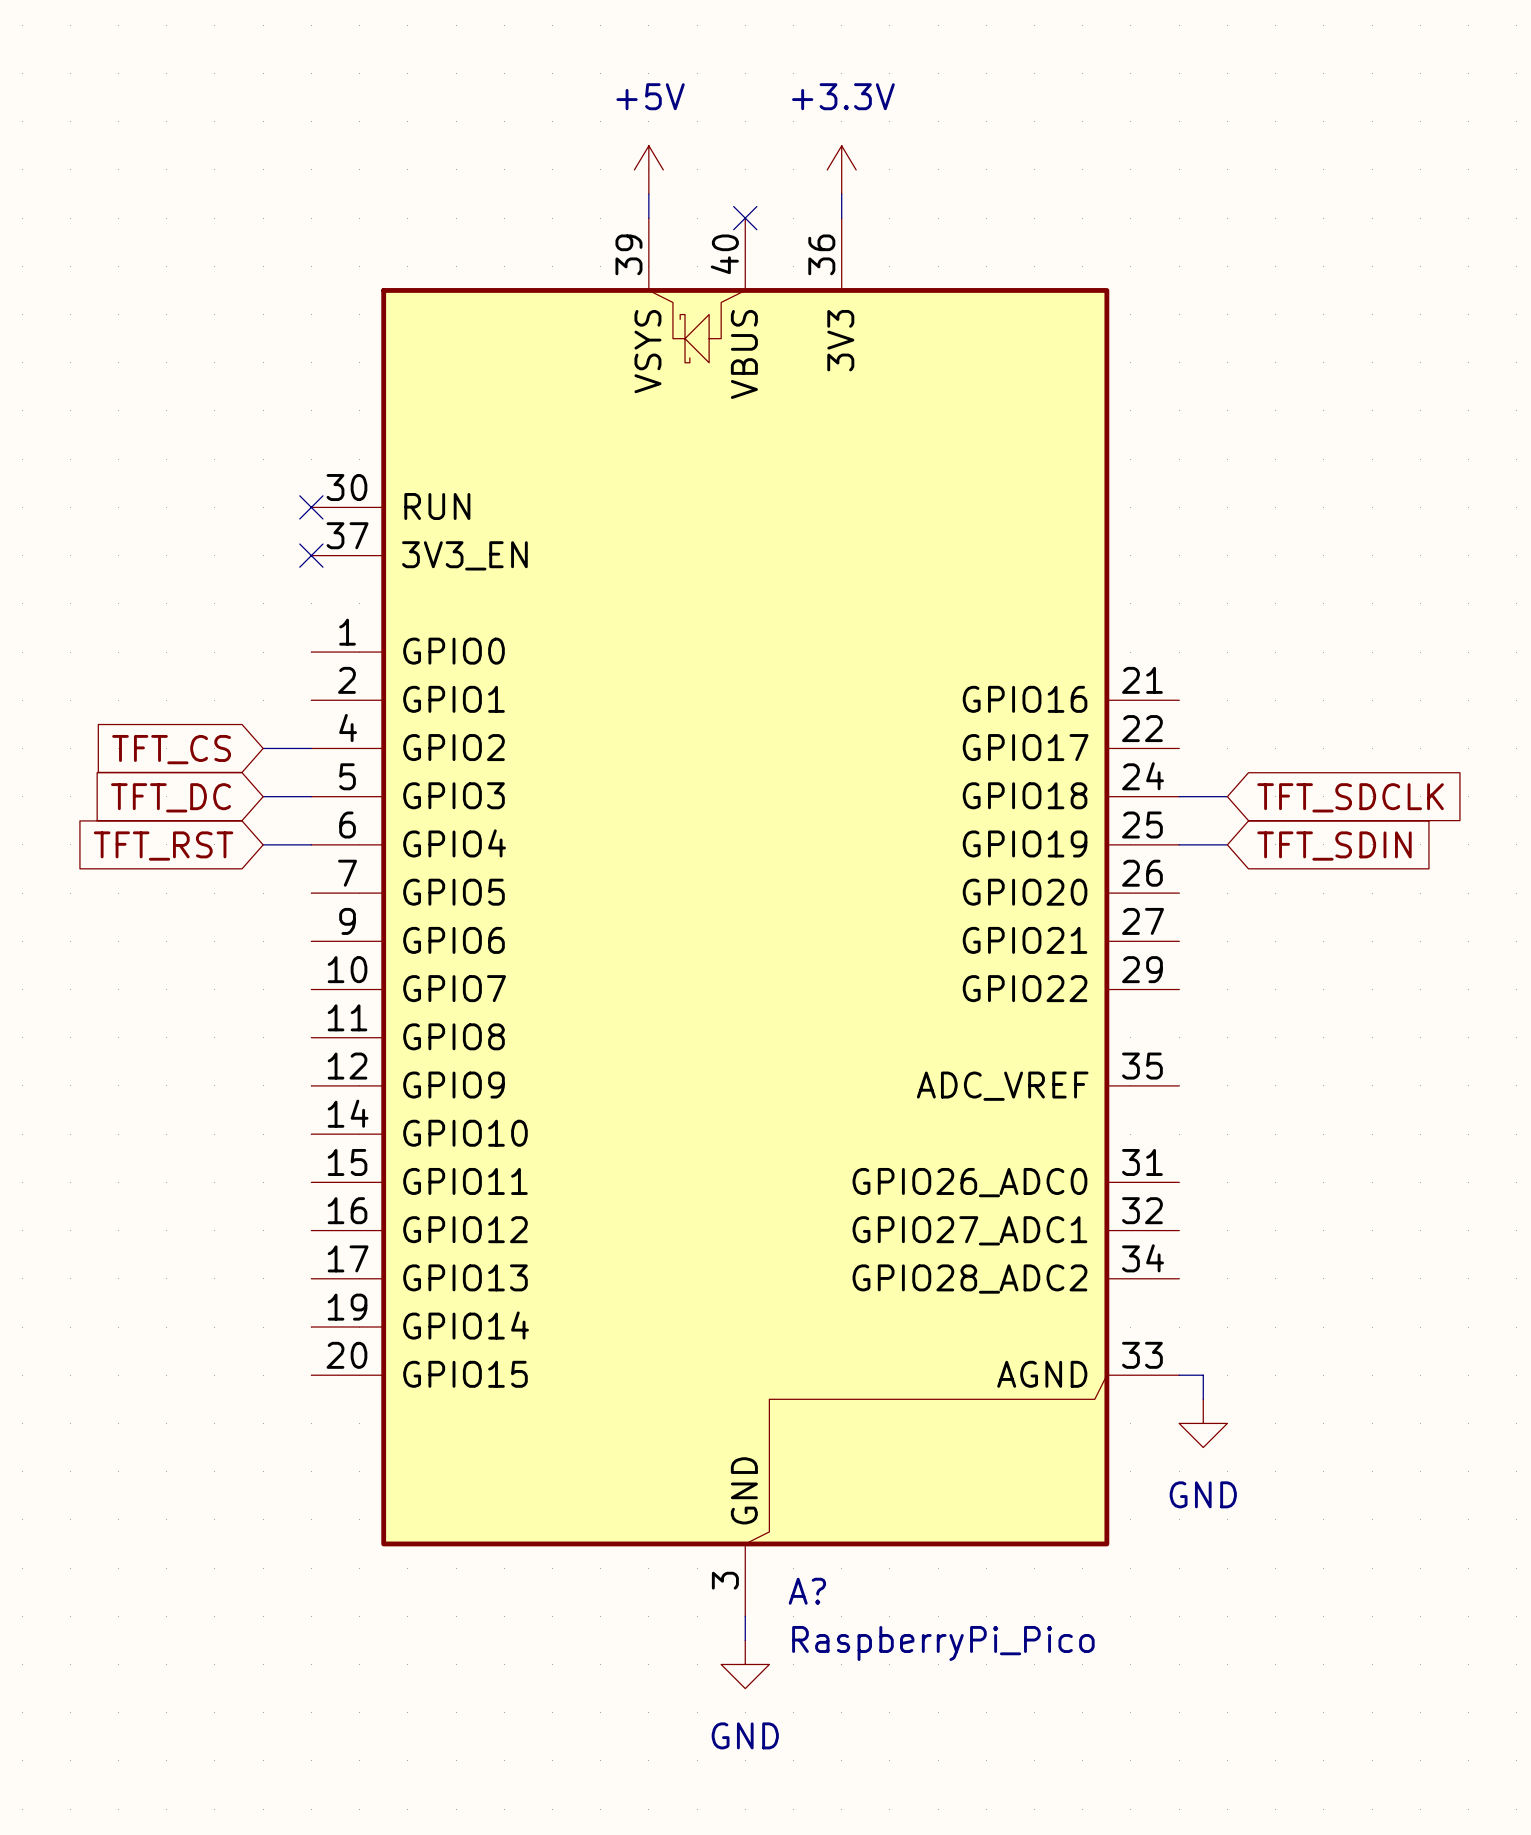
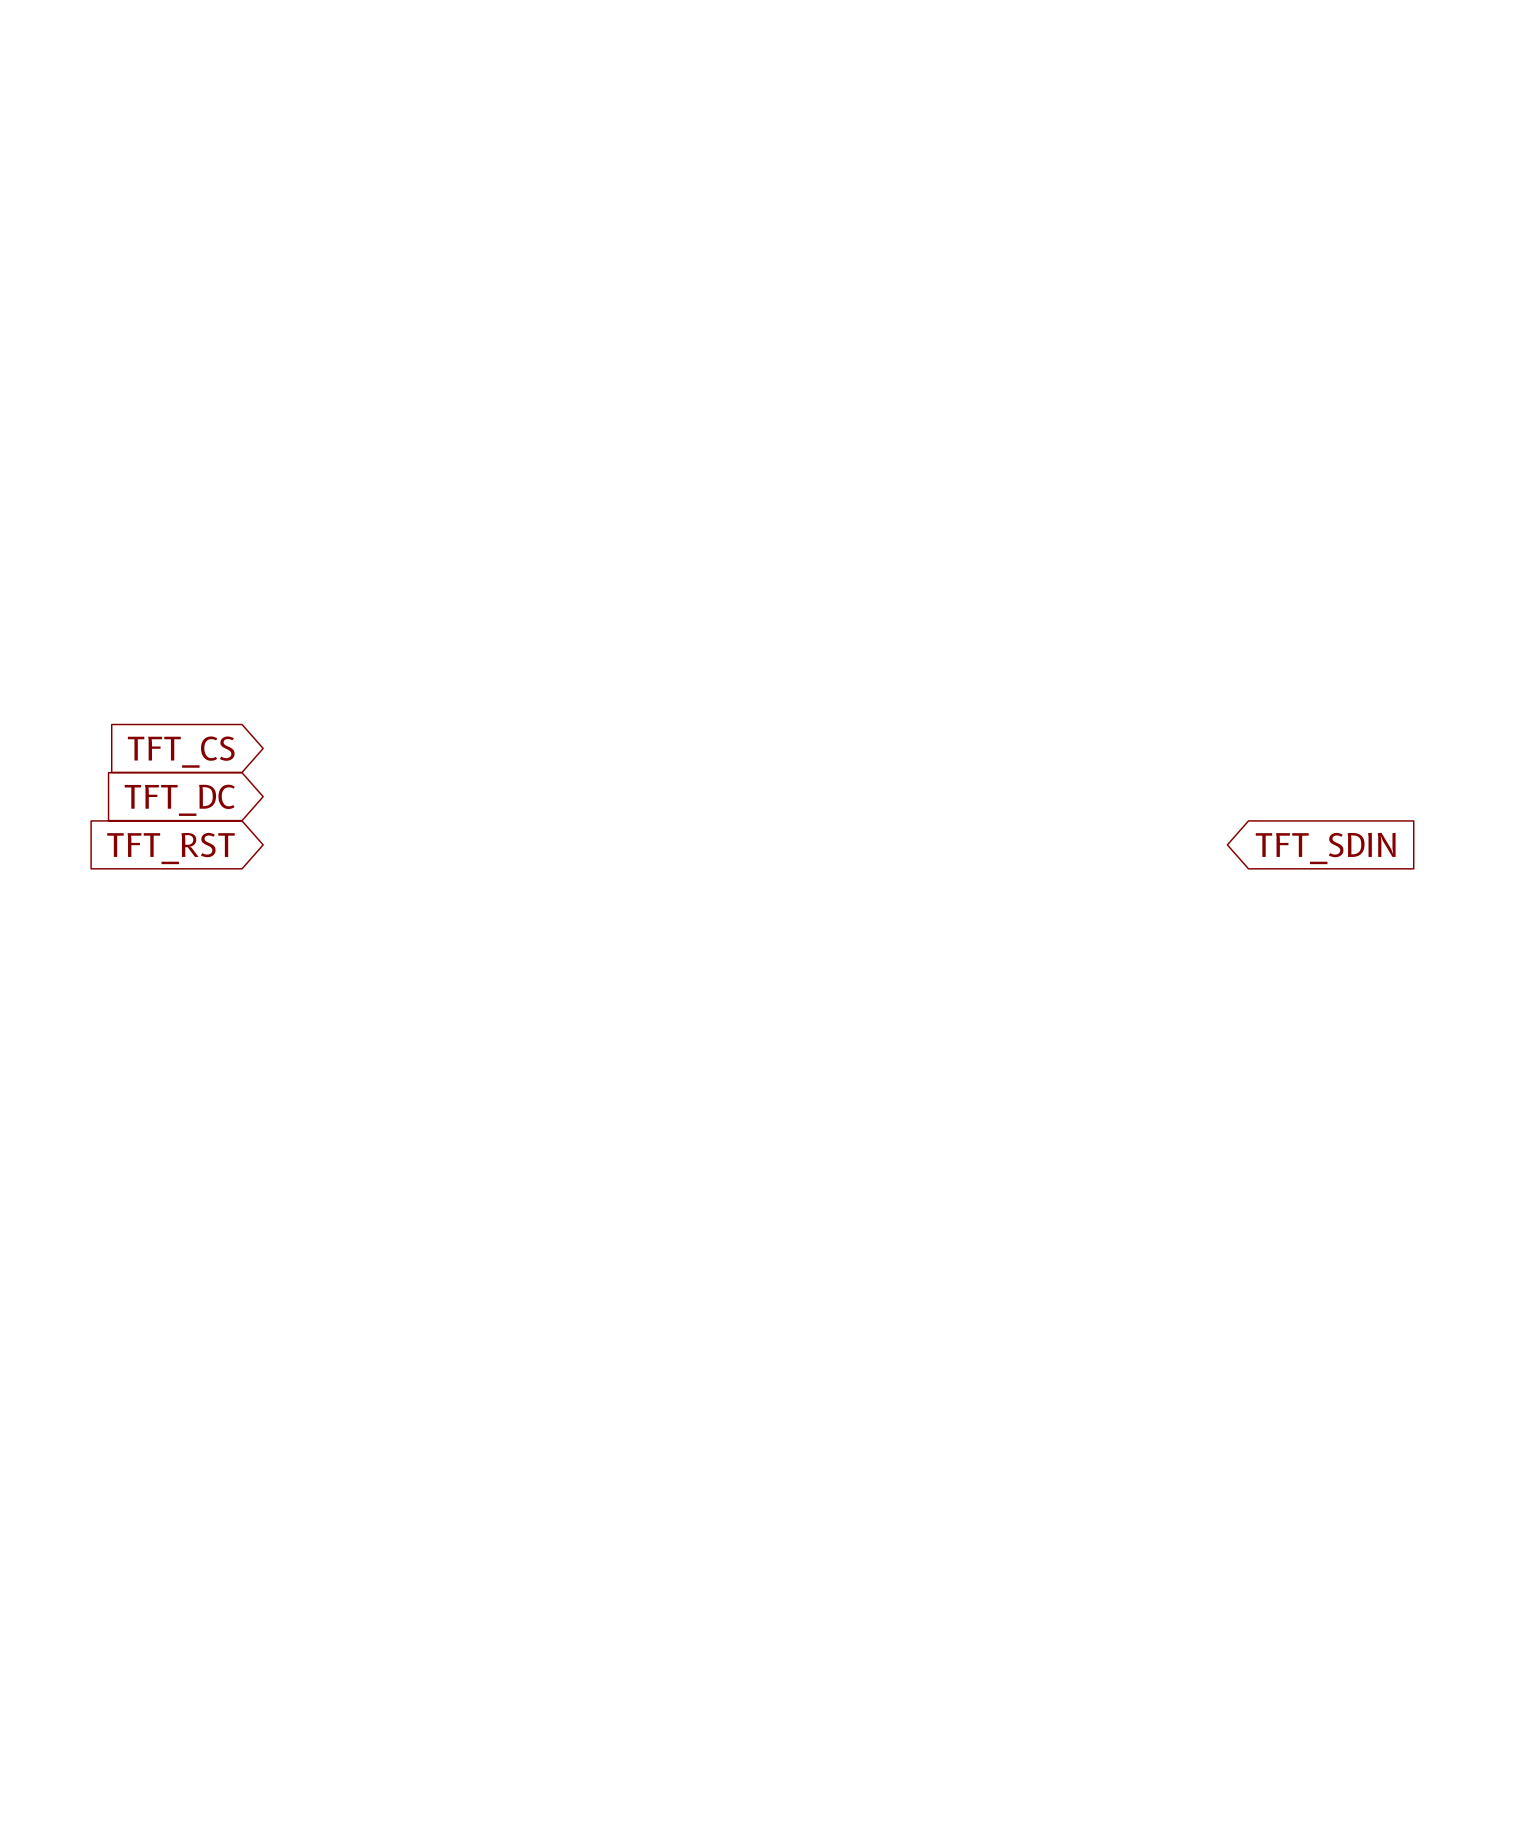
power symbol: +5V (648, 169) -> none
power symbol: +3.3V (841, 169) -> none
wire: (648, 194) (648, 218) -> none
wire: (841, 194) (841, 218) -> none
no-connect mark: (745, 218) -> none
no-connect mark: (311, 507) -> none
no-connect mark: (311, 555) -> none
wire: (263, 748) (311, 748) -> none
wire: (263, 796) (311, 796) -> none
wire: (1179, 796) (1227, 796) -> none
global label: TFT_SDCLK (1350, 797) -> none
wire: (263, 844) (311, 844) -> none
wire: (1179, 844) (1227, 844) -> none
A?: RaspberryPi_Pico (745, 917) -> none
wire: (1179, 1375) (1203, 1375) (1203, 1399) -> none
power symbol: GND (1203, 1423) -> none
wire: (745, 1616) (745, 1640) -> none
power symbol: GND (745, 1664) -> none

